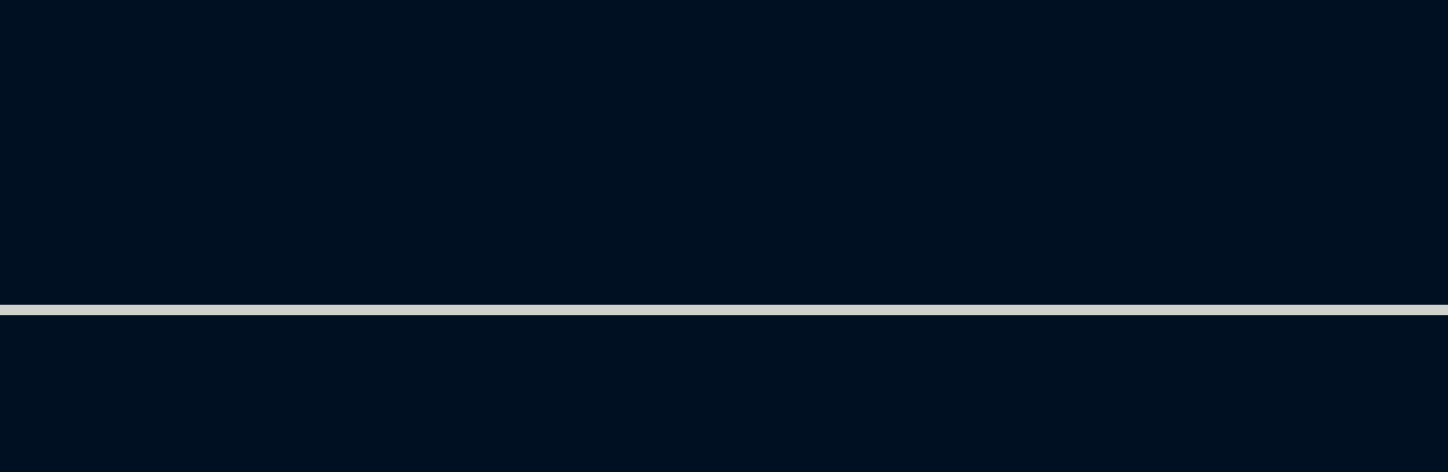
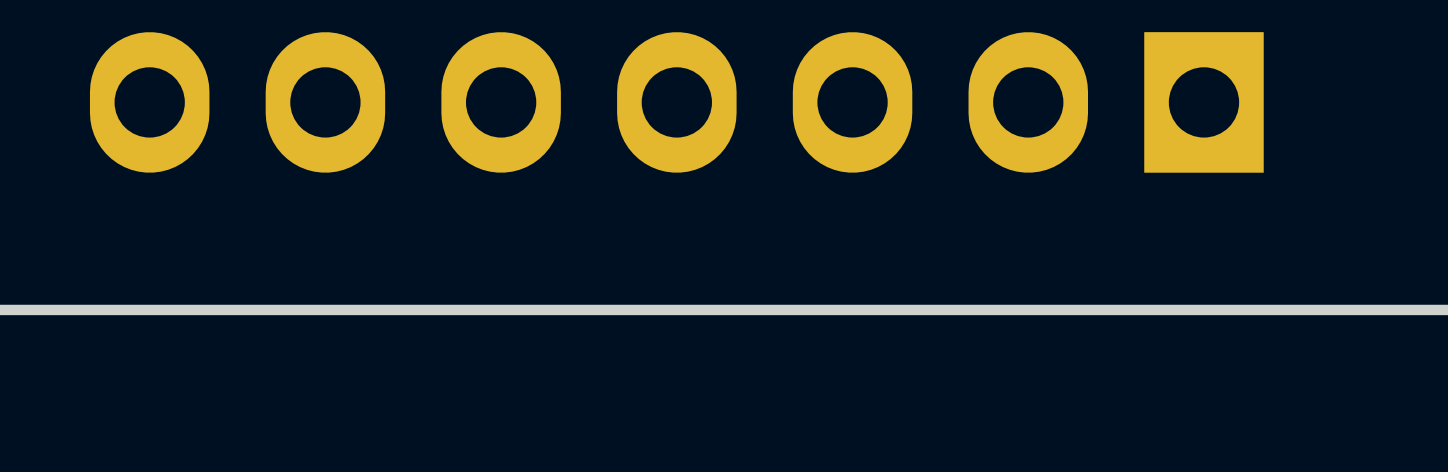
part: none -> (676, 102)

